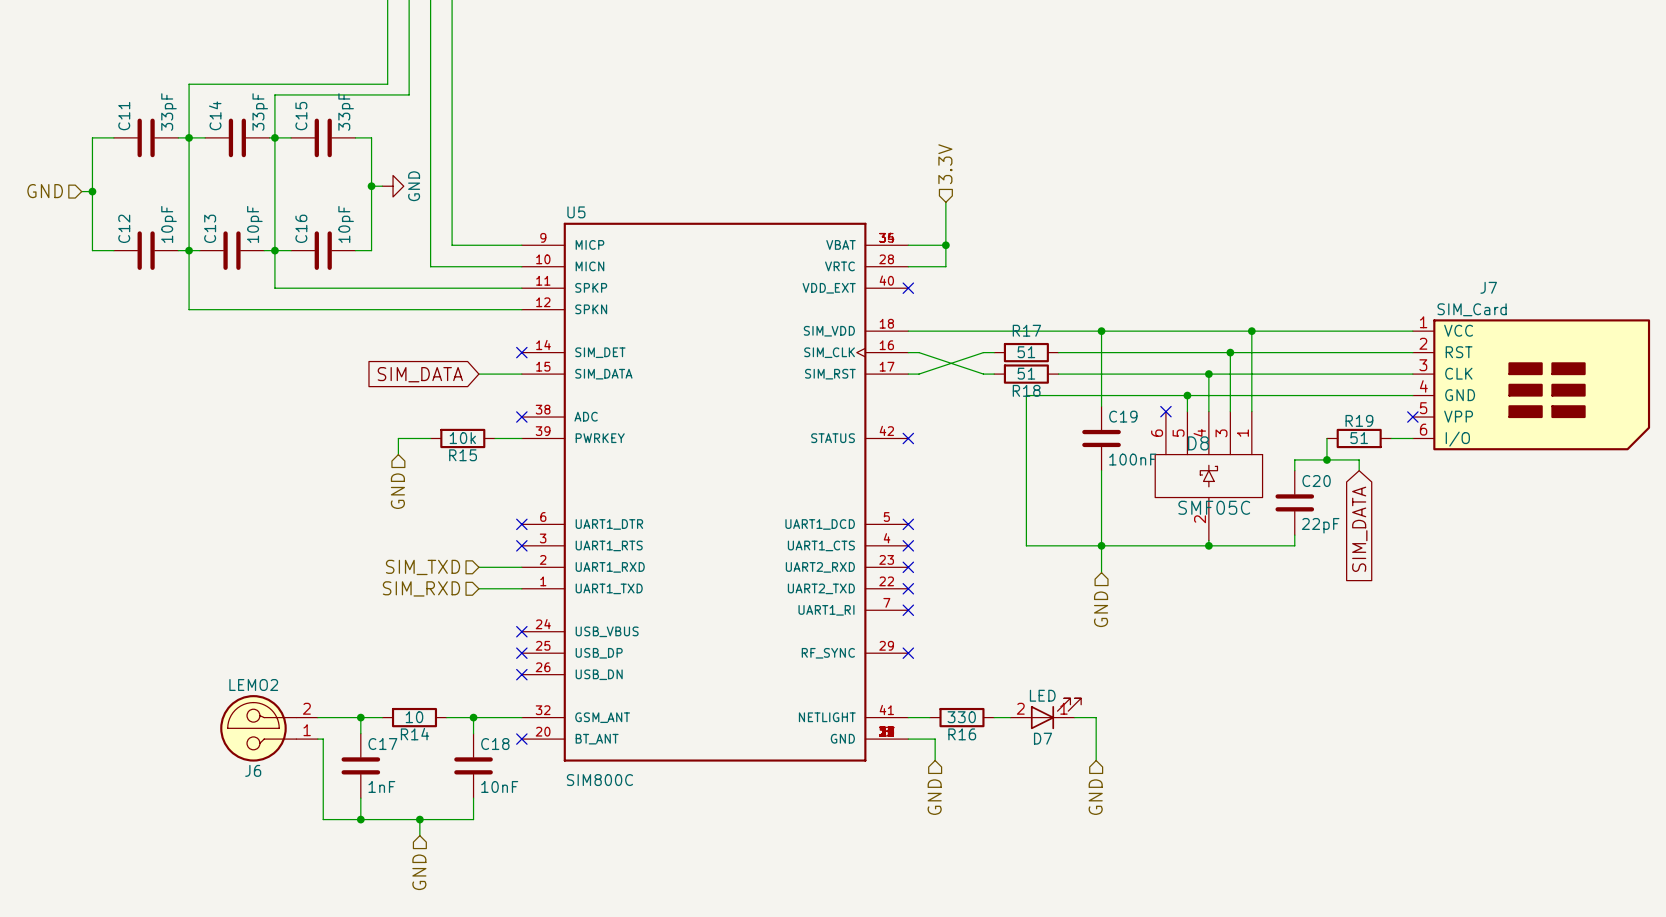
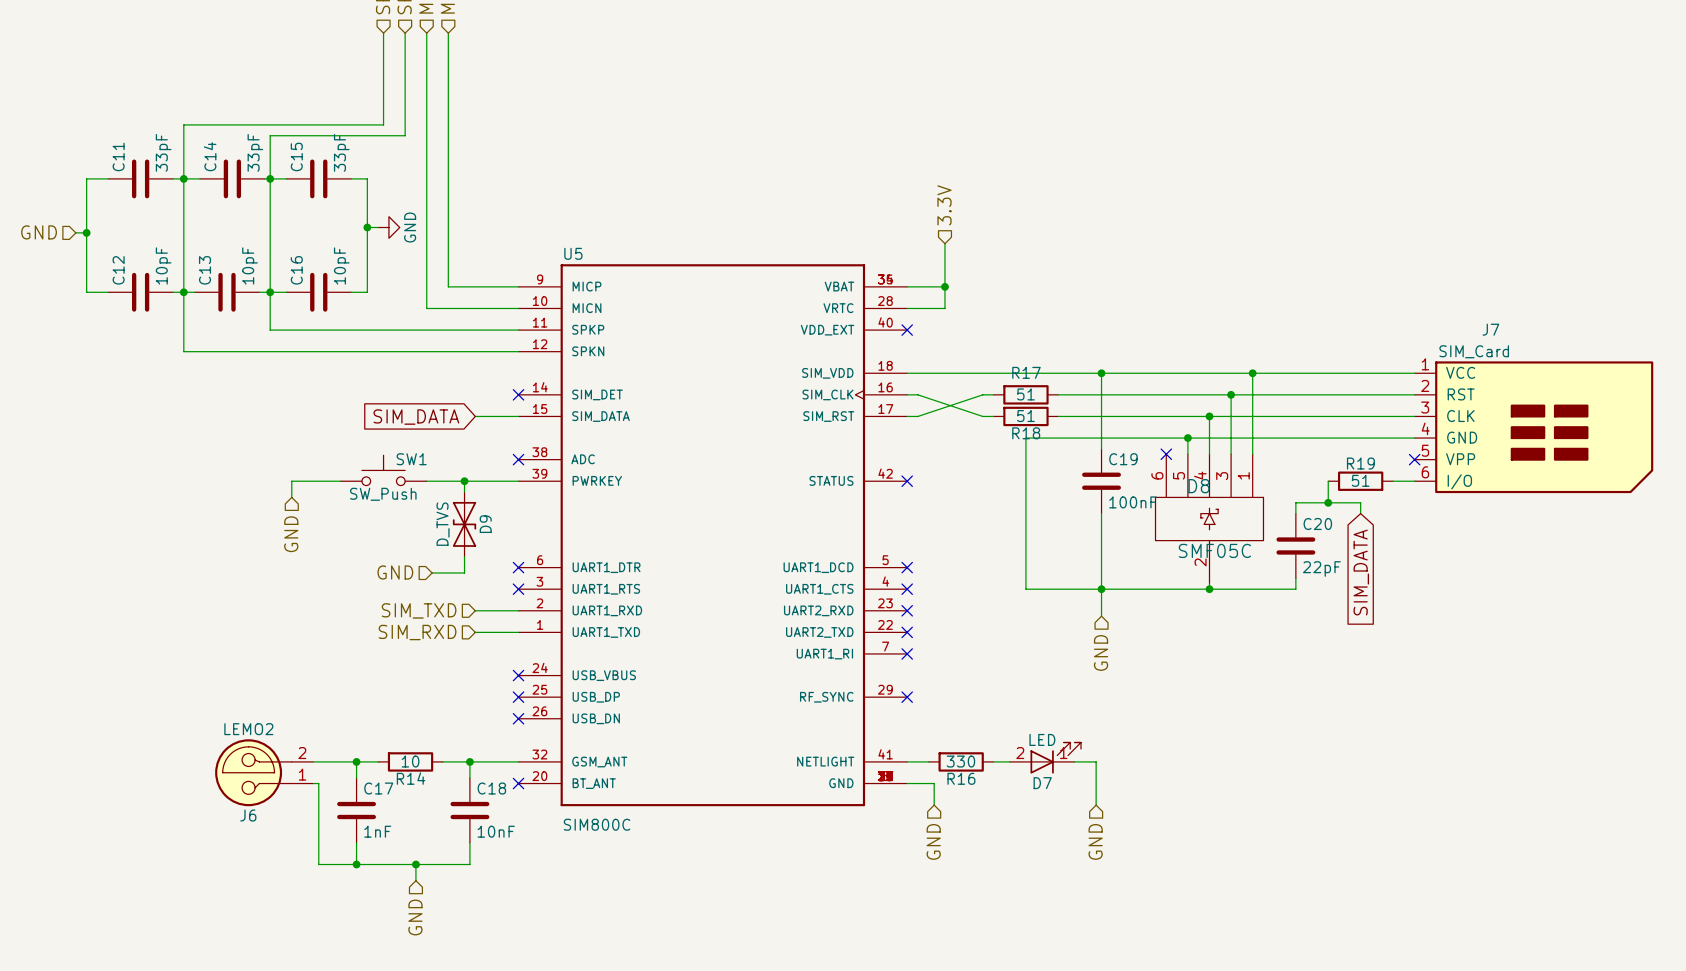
SW1: none -> SW_Push (383, 470)
wire: none -> (340, 481) (291, 481) (291, 497)
wire: (430, 438) (398, 438) (398, 454) -> (426, 481) (491, 481)
R15: 10k (462, 438) -> none
wire: none -> (464, 481) (464, 492)
junction: none -> (464, 481)
D9: none -> D_TVS (464, 524)
hierarchical label: none -> GND (291, 534)
hierarchical label rotation: 0° (397, 491) -> 90° clockwise (395, 572)
wire: none -> (464, 556) (464, 572) (432, 572)

